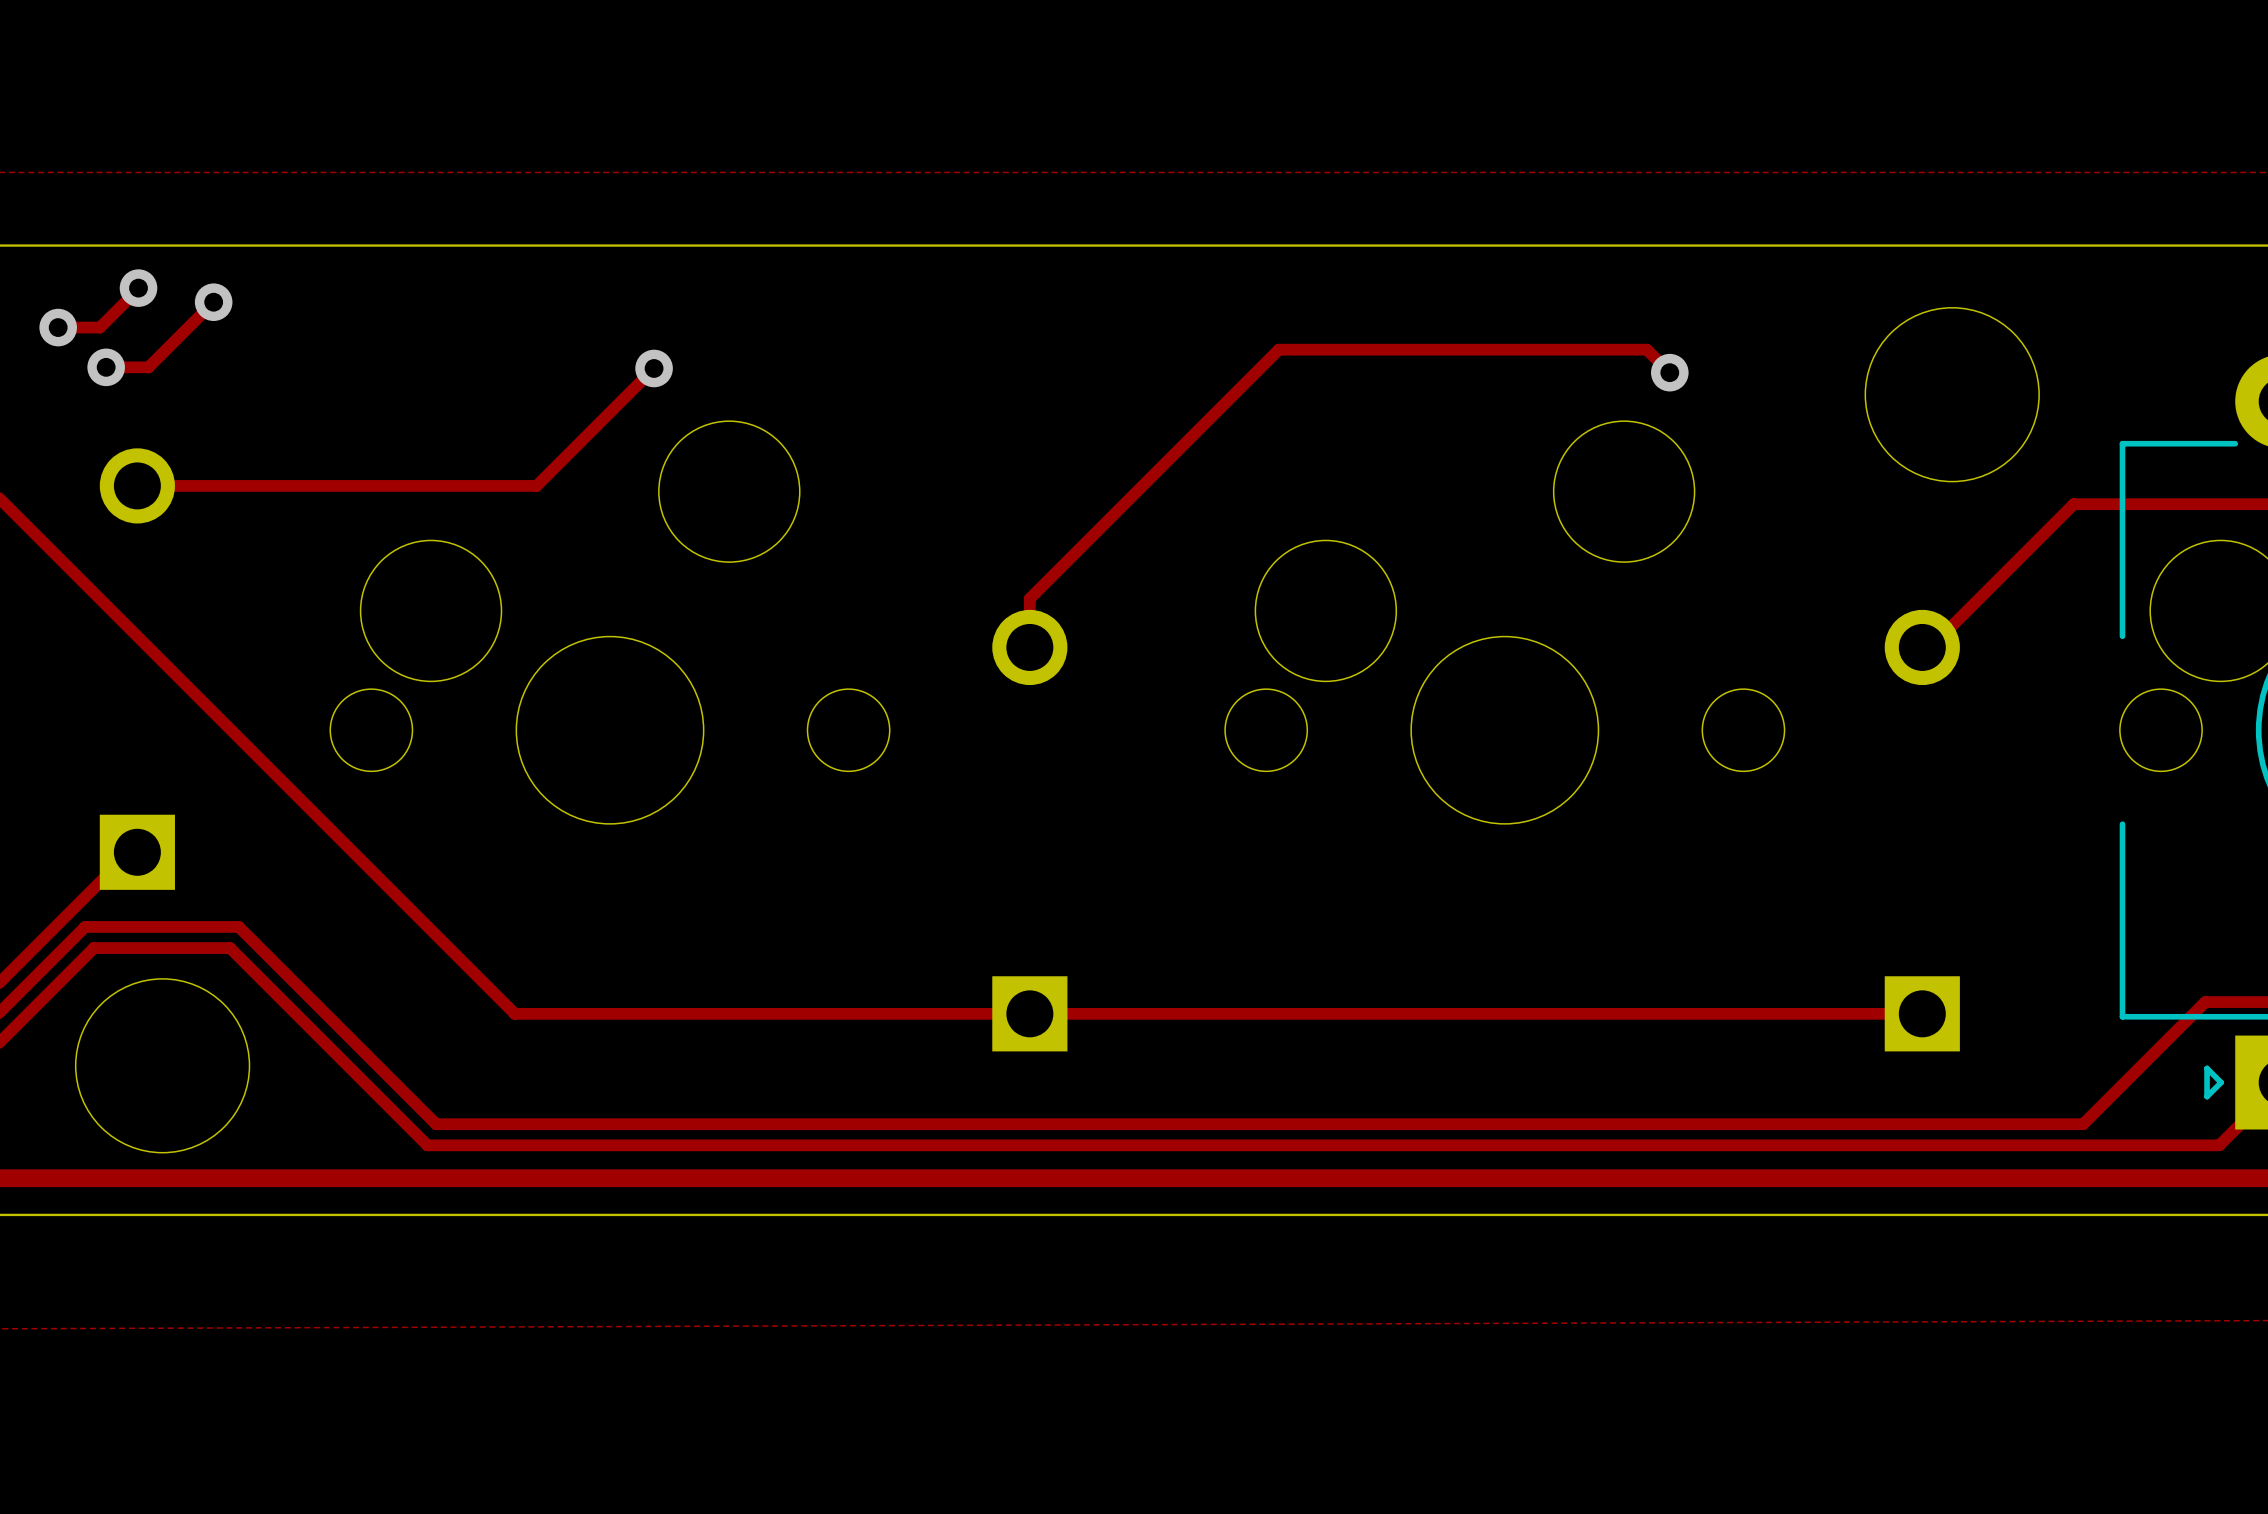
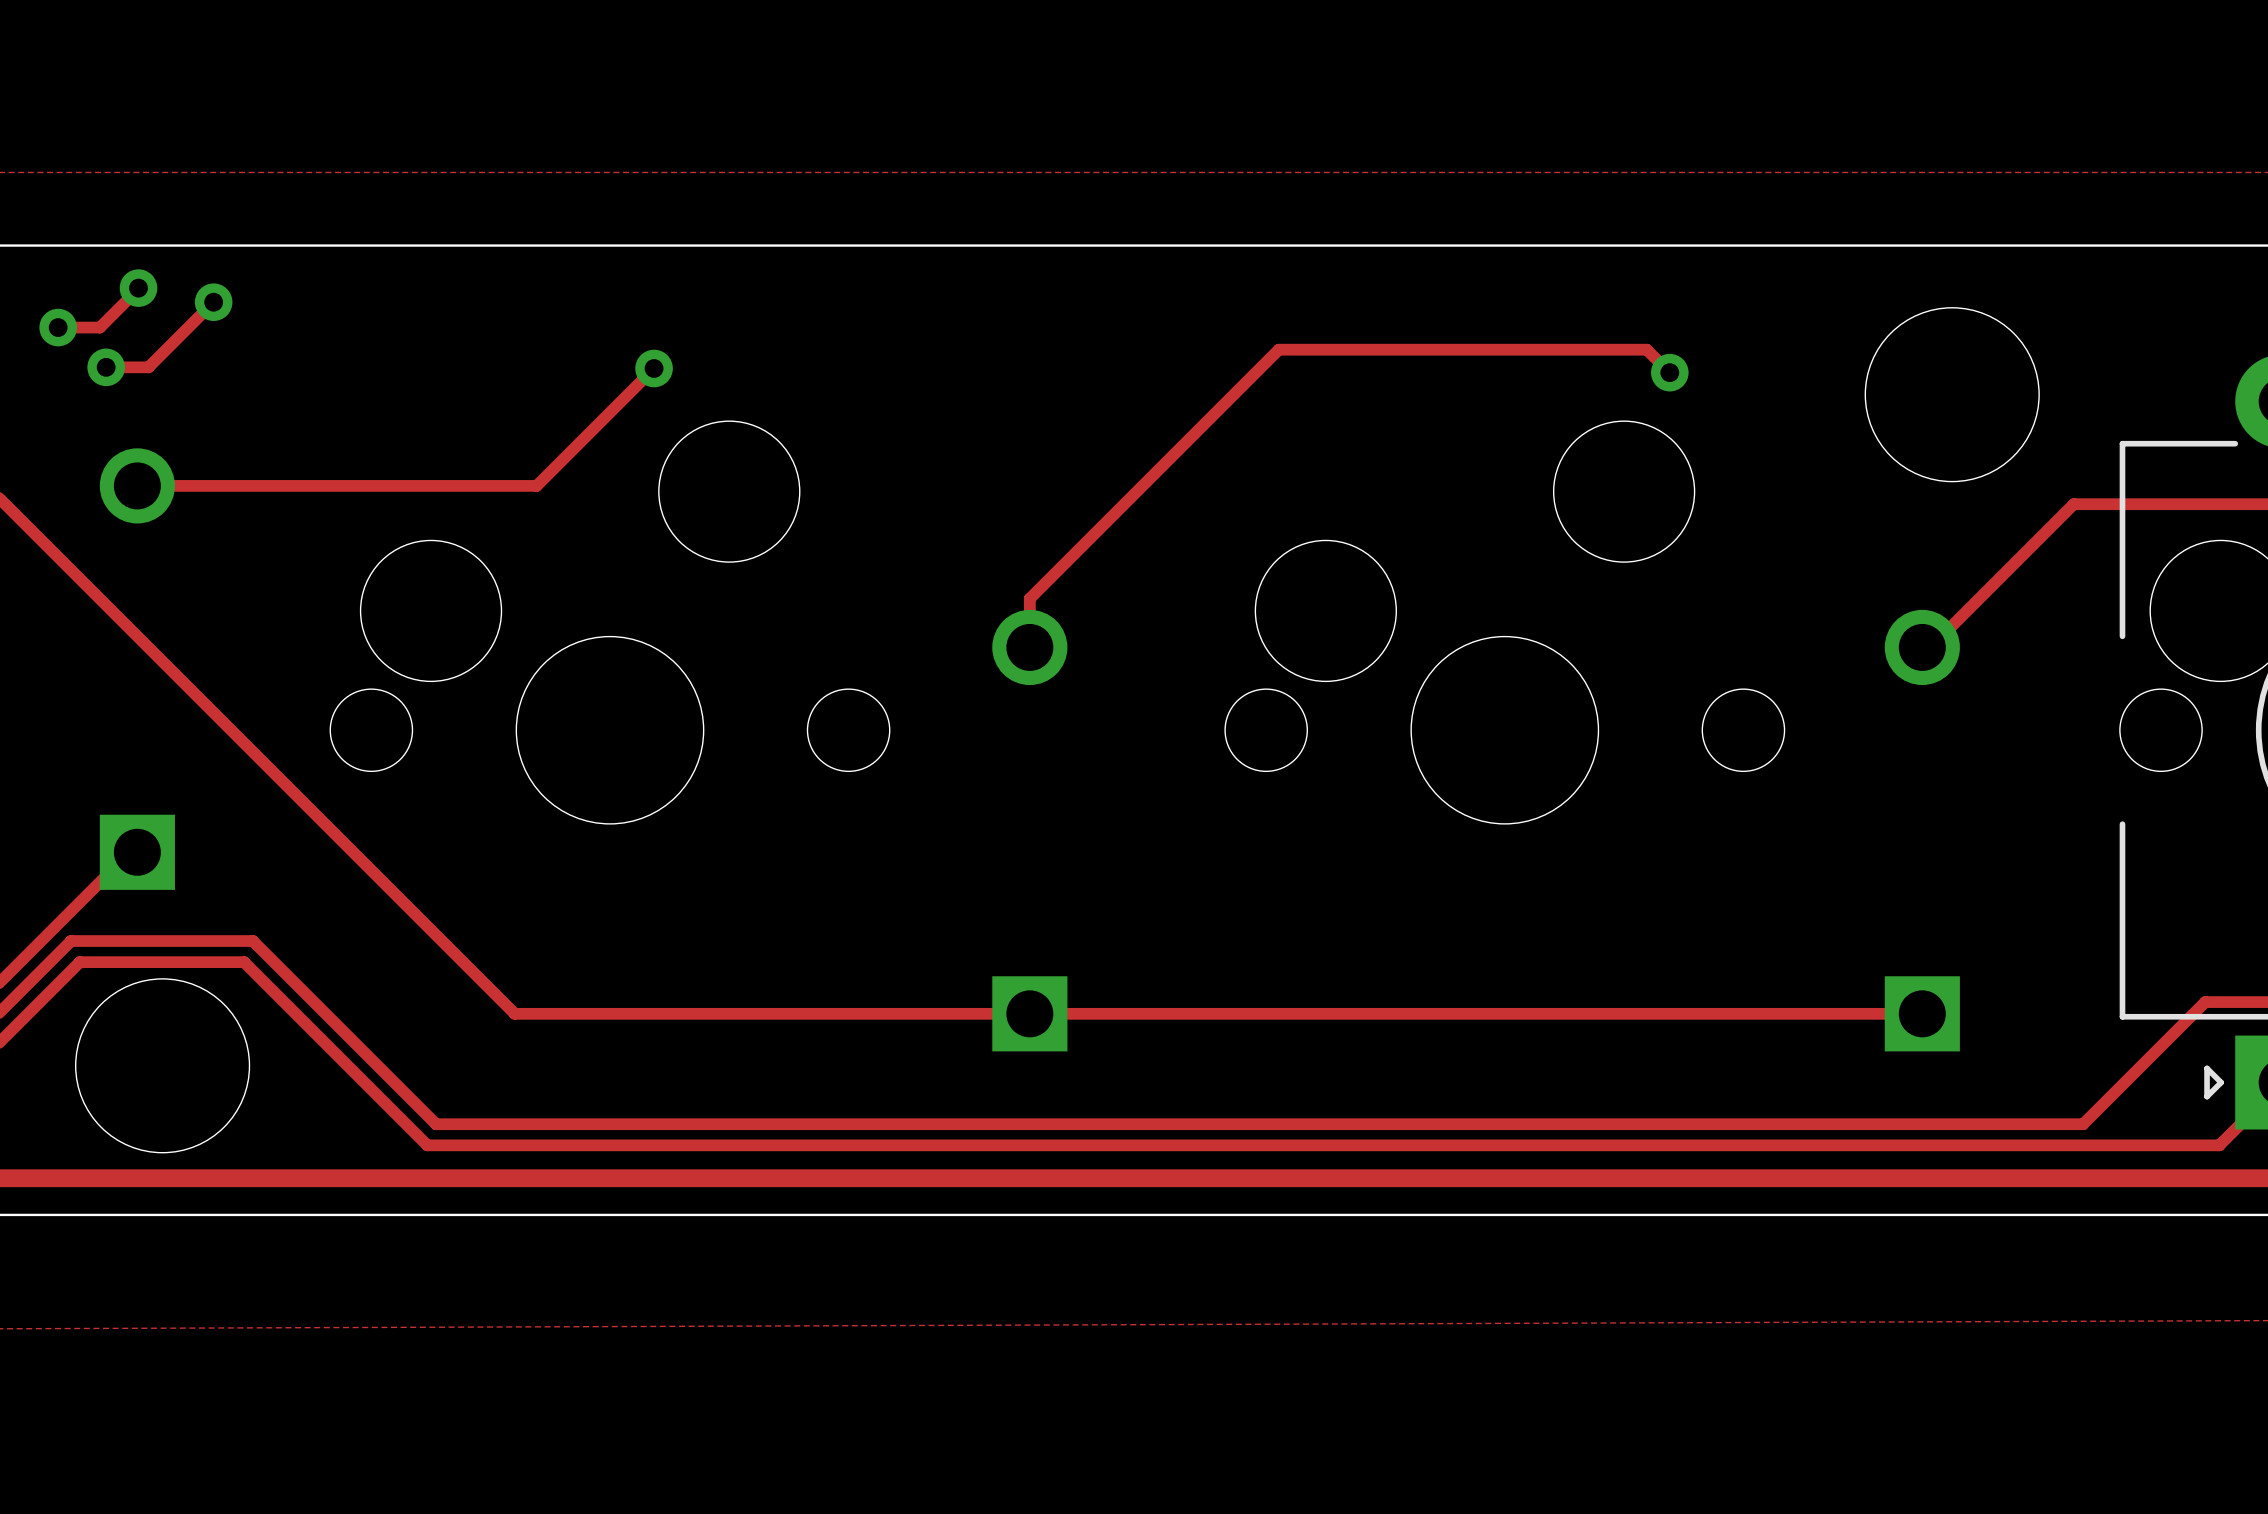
track: (71, 941) (85, 926) (238, 926) (252, 941) -> (71, 941) (252, 941)
track: (79, 962) (93, 948) (230, 948) (244, 962) -> (79, 962) (244, 962)

